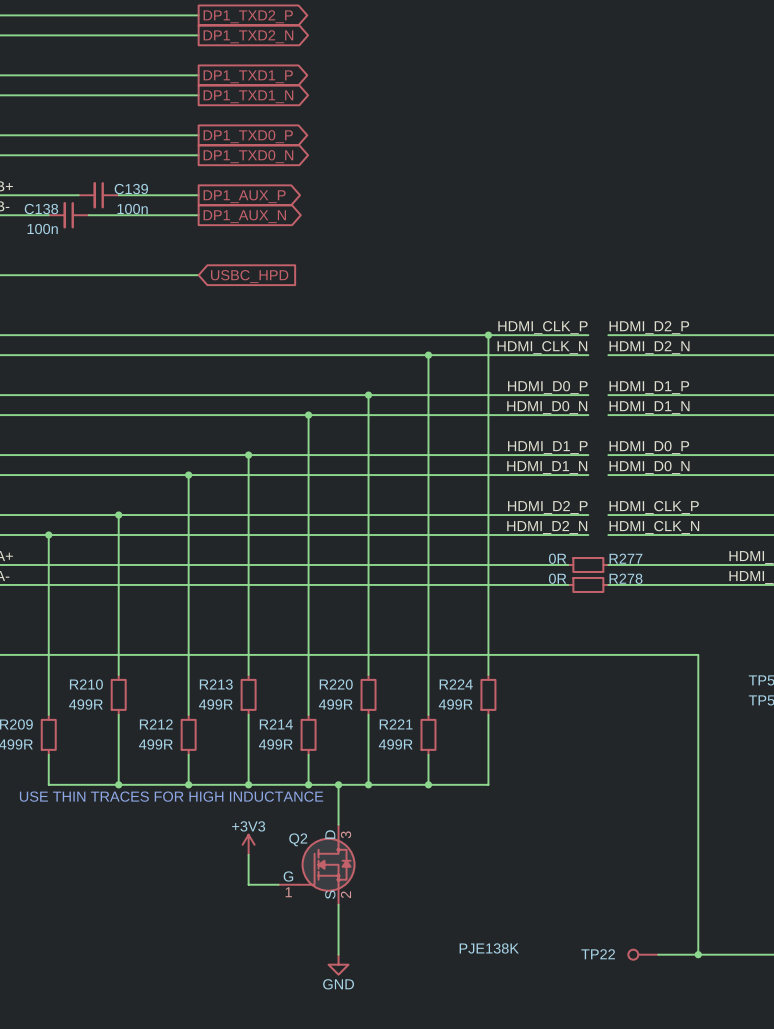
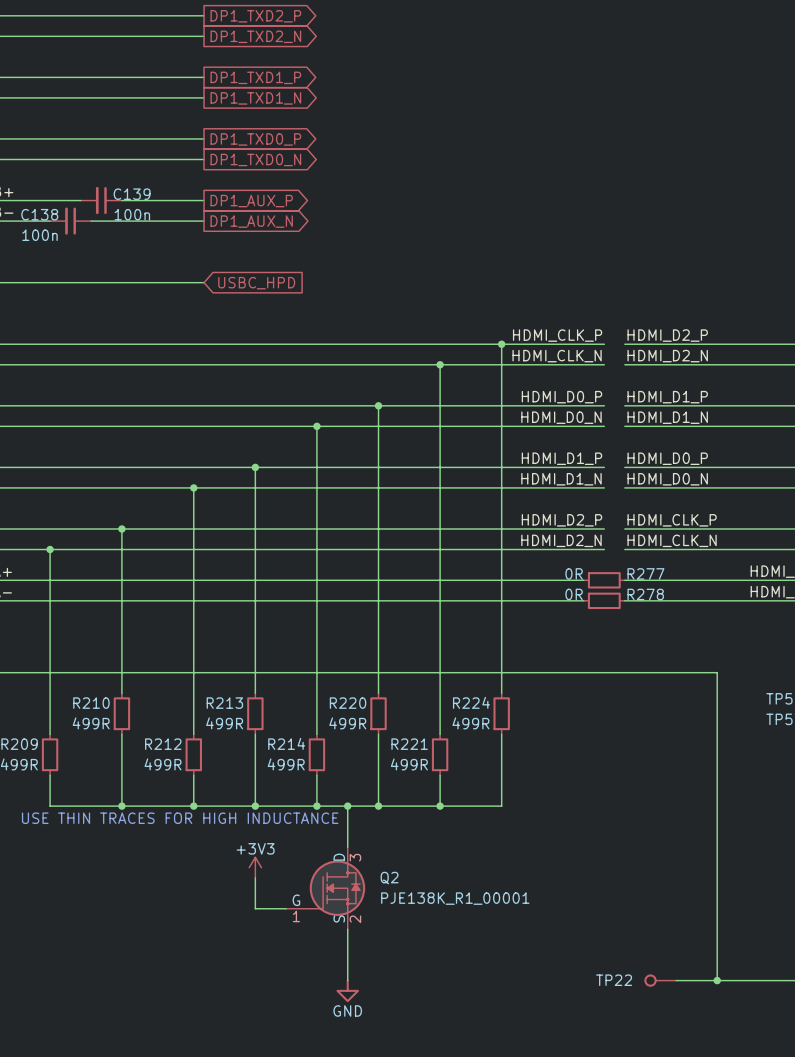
Q2 name position: Q2 (298, 839) -> Q2 (389, 878)
Q2 text: none -> PJE138K_R1_00001 (455, 898)
Q2 value: PJE138K (489, 948) -> none

